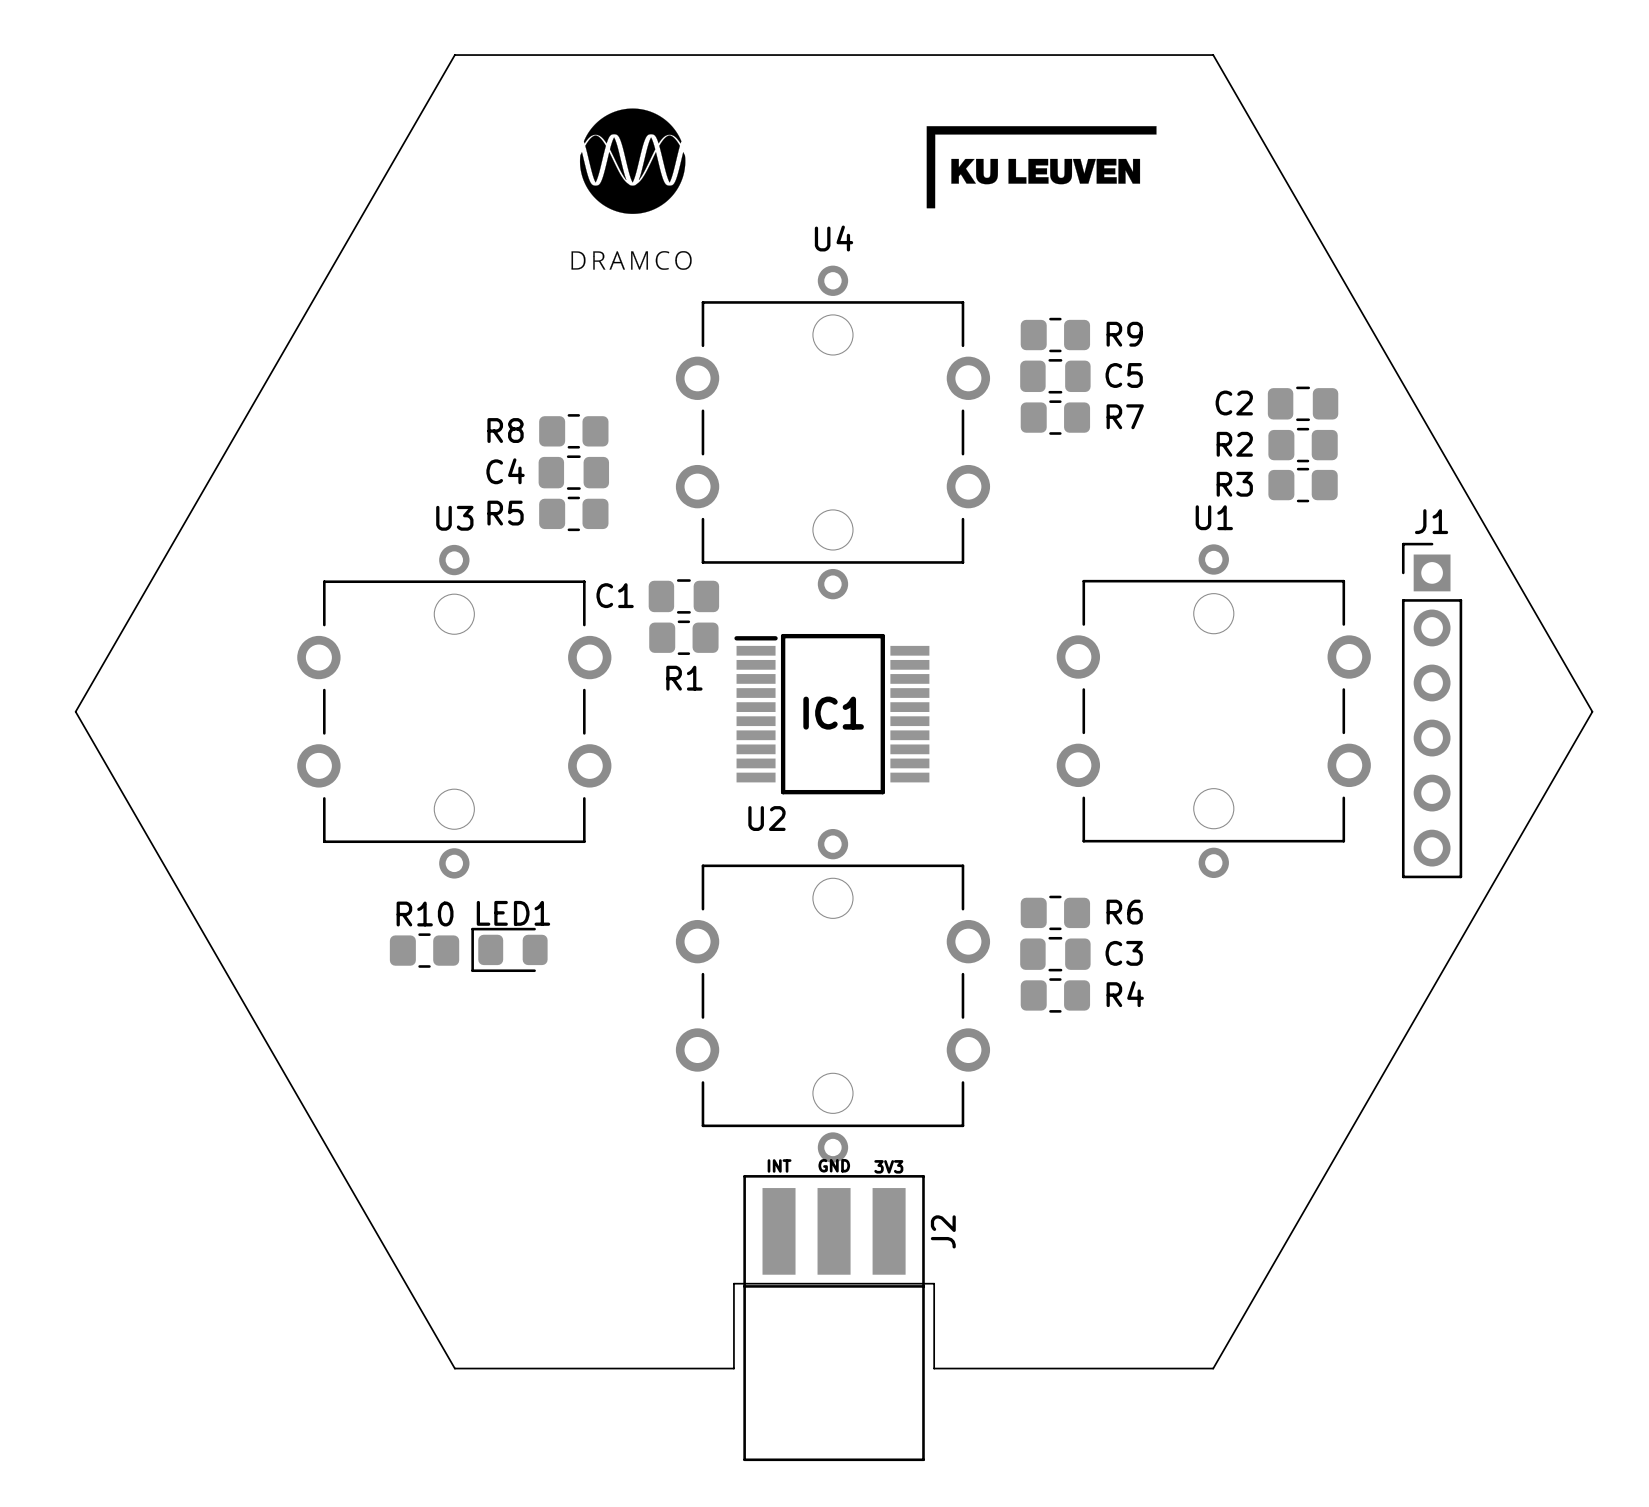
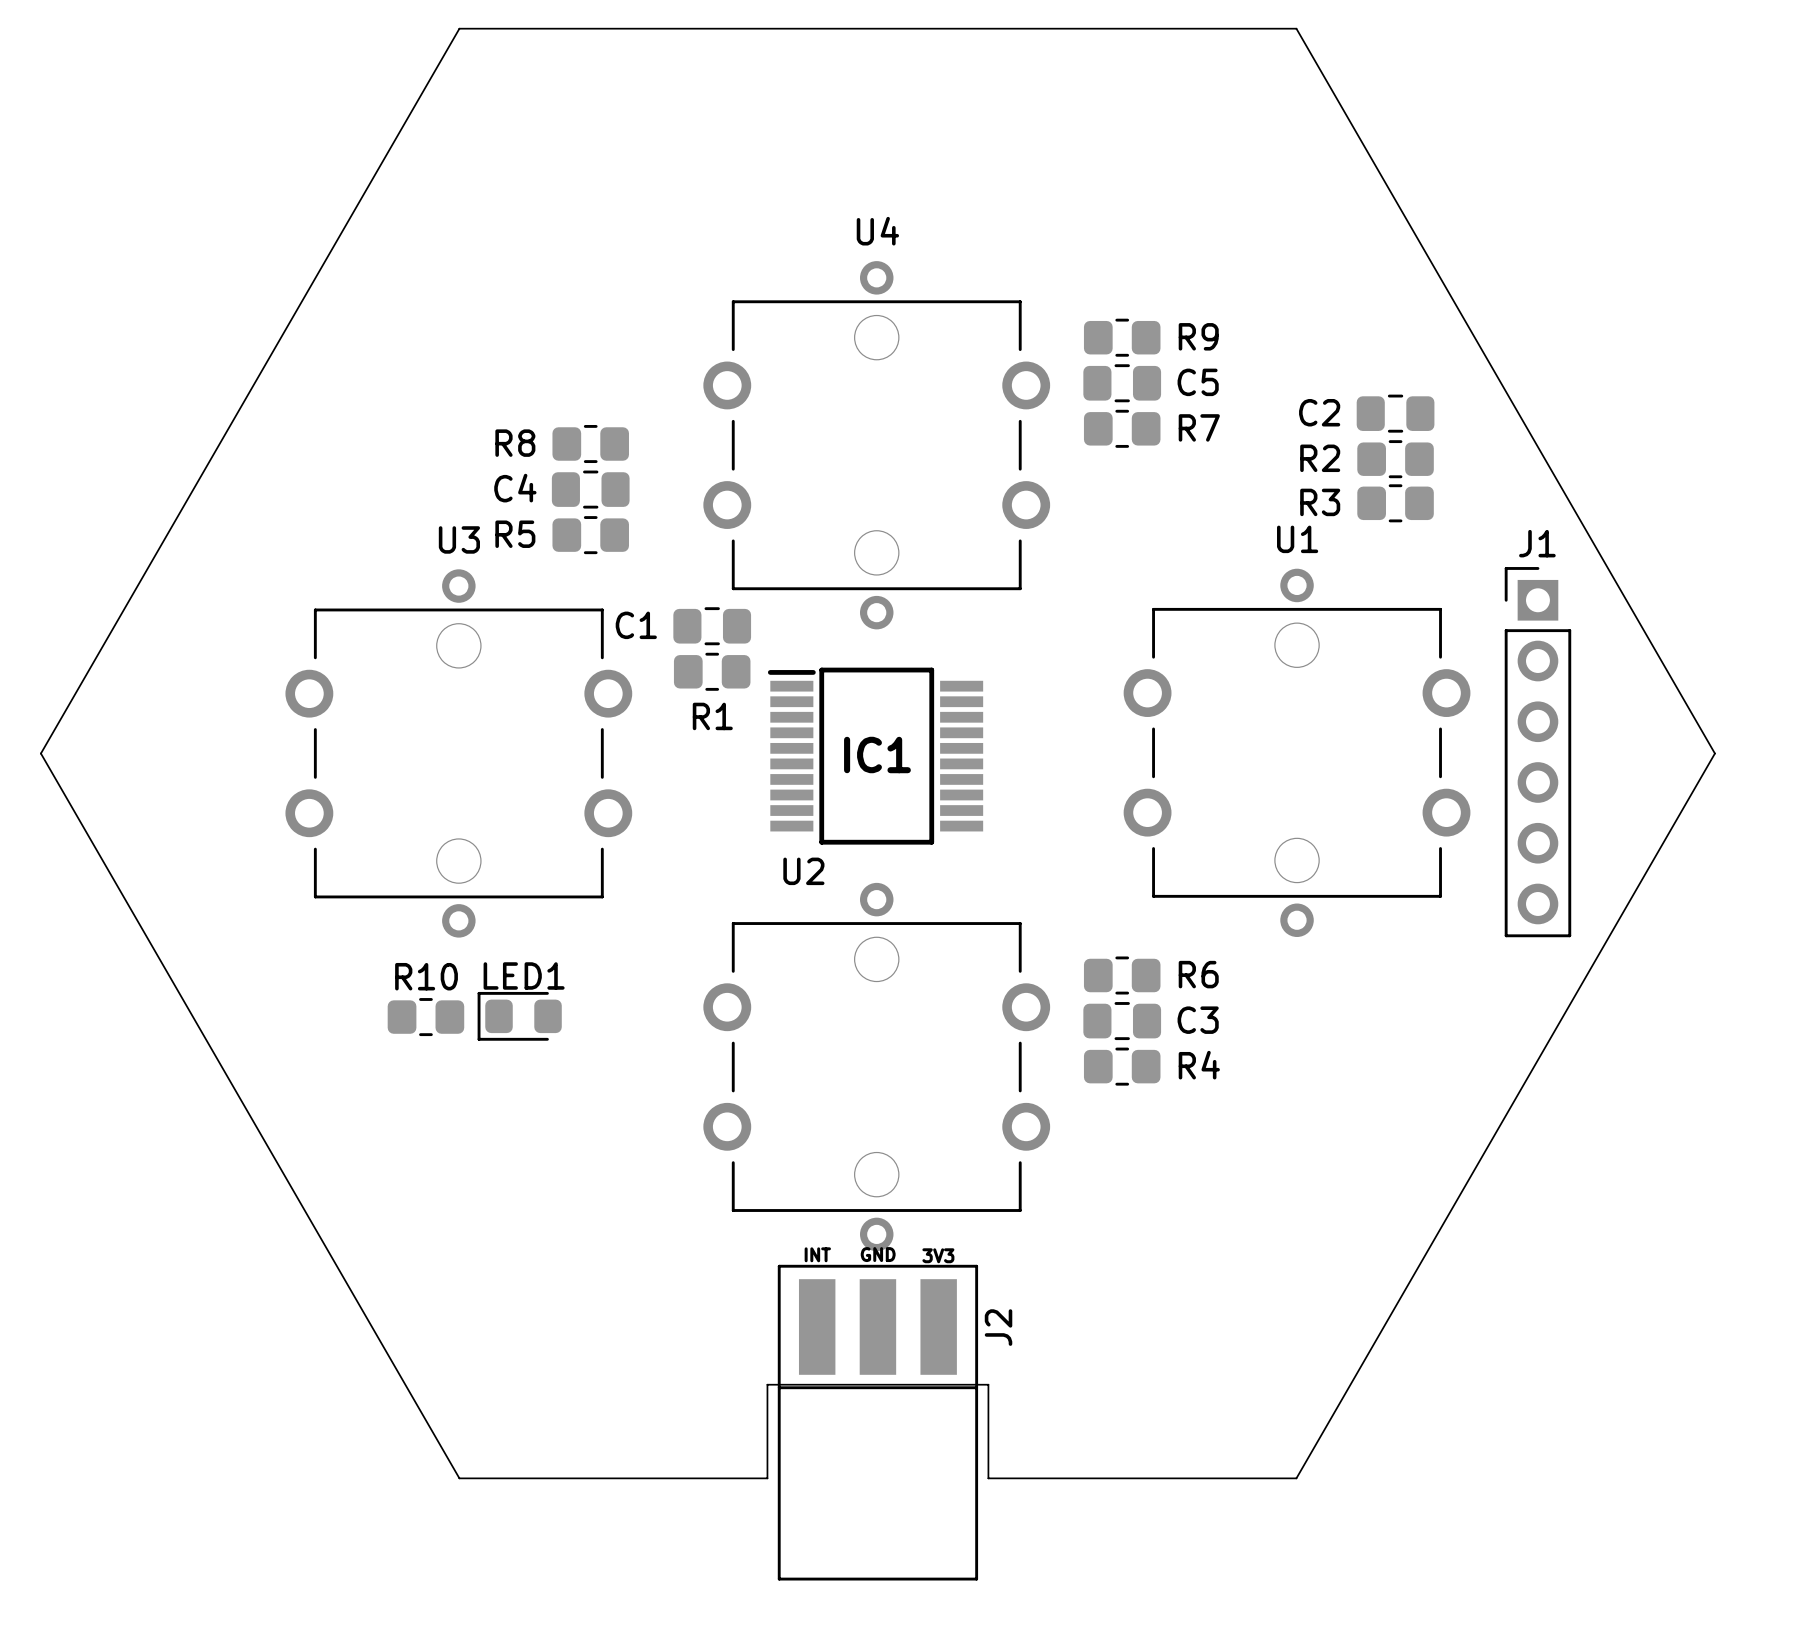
drawing: [571, 108, 692, 270] -> none
drawing: [926, 126, 1157, 209] -> none

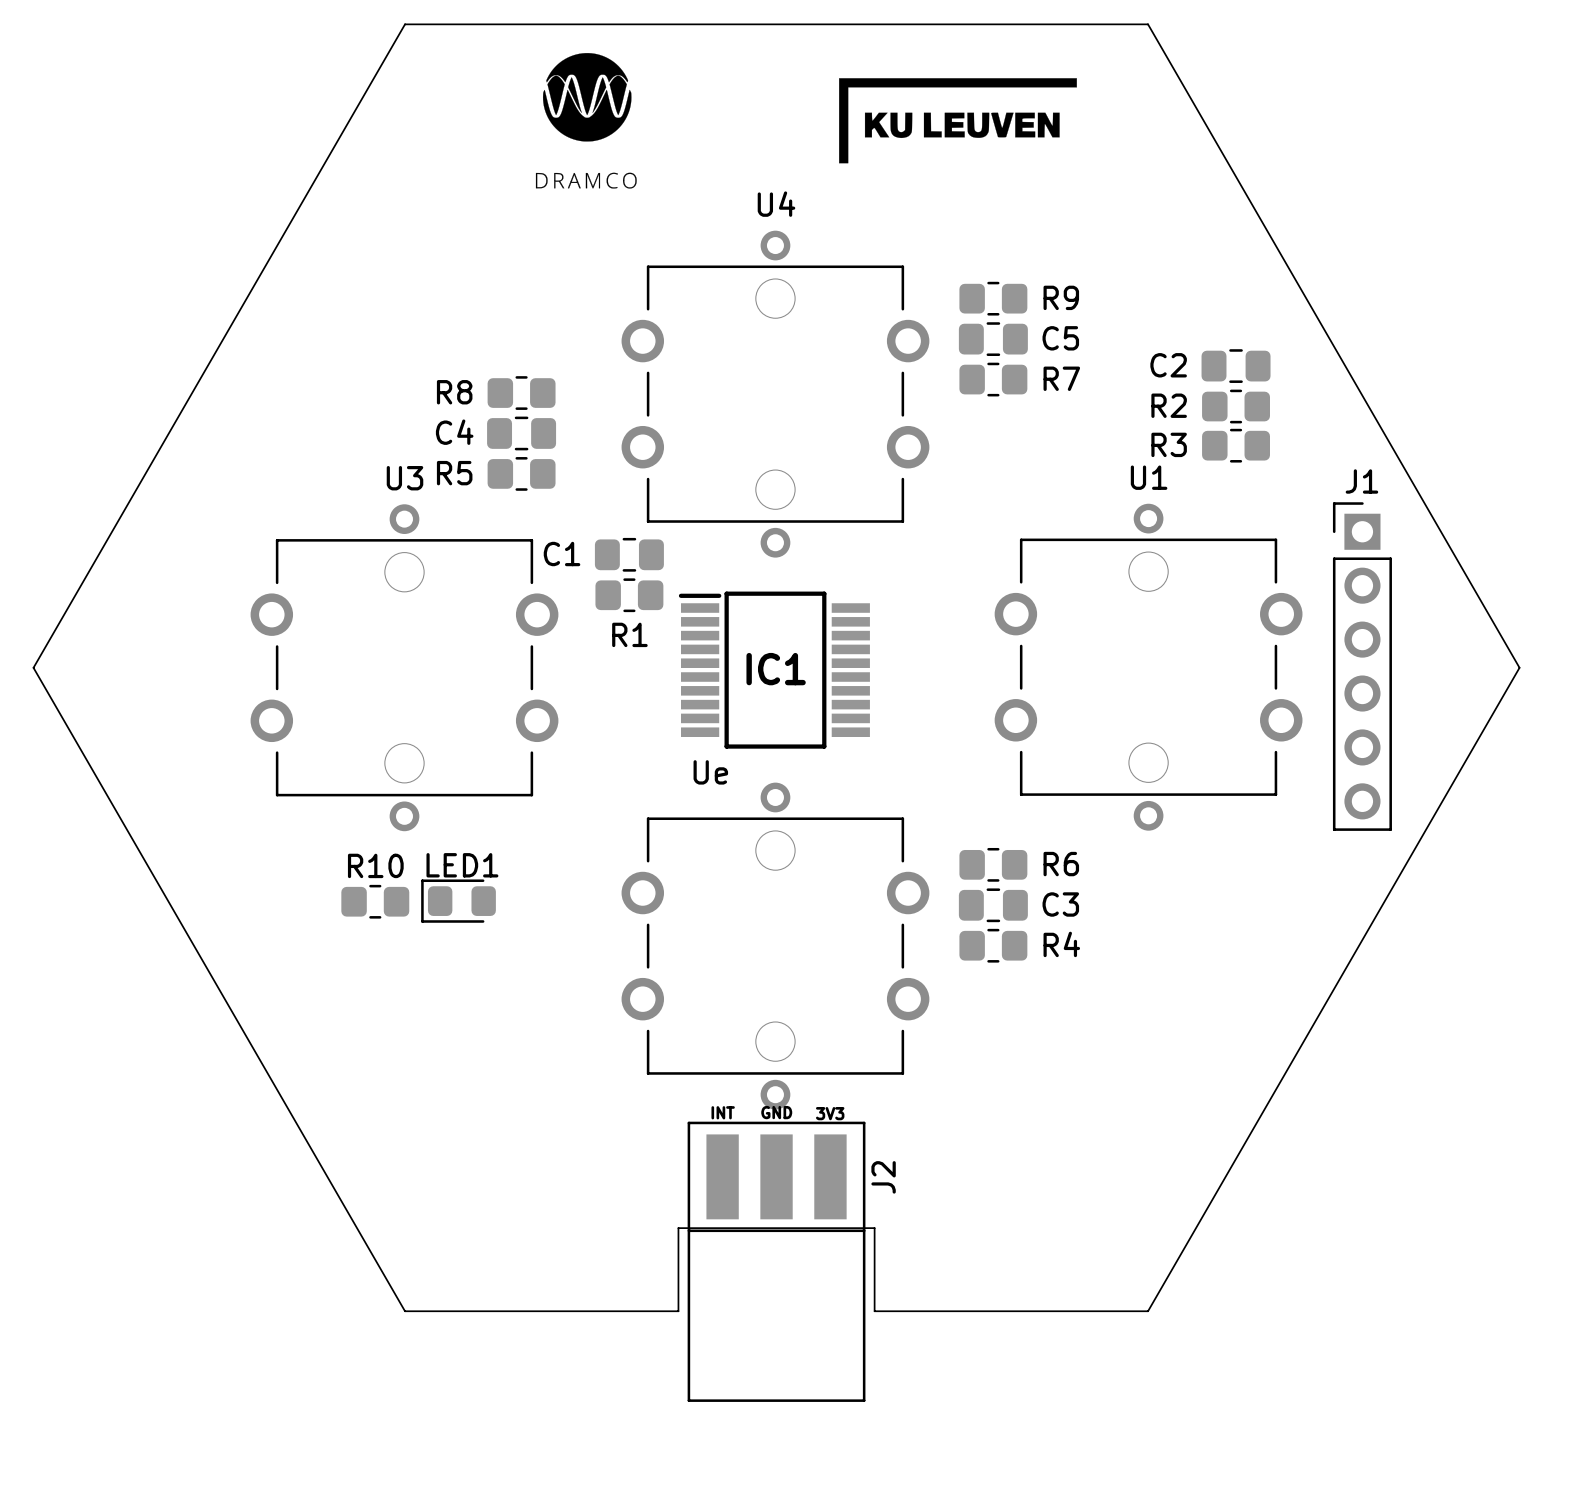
drawing: none -> [535, 53, 637, 189]
drawing: none -> [839, 78, 1077, 164]
U2 name: U2 (803, 871) -> Ue (710, 772)

